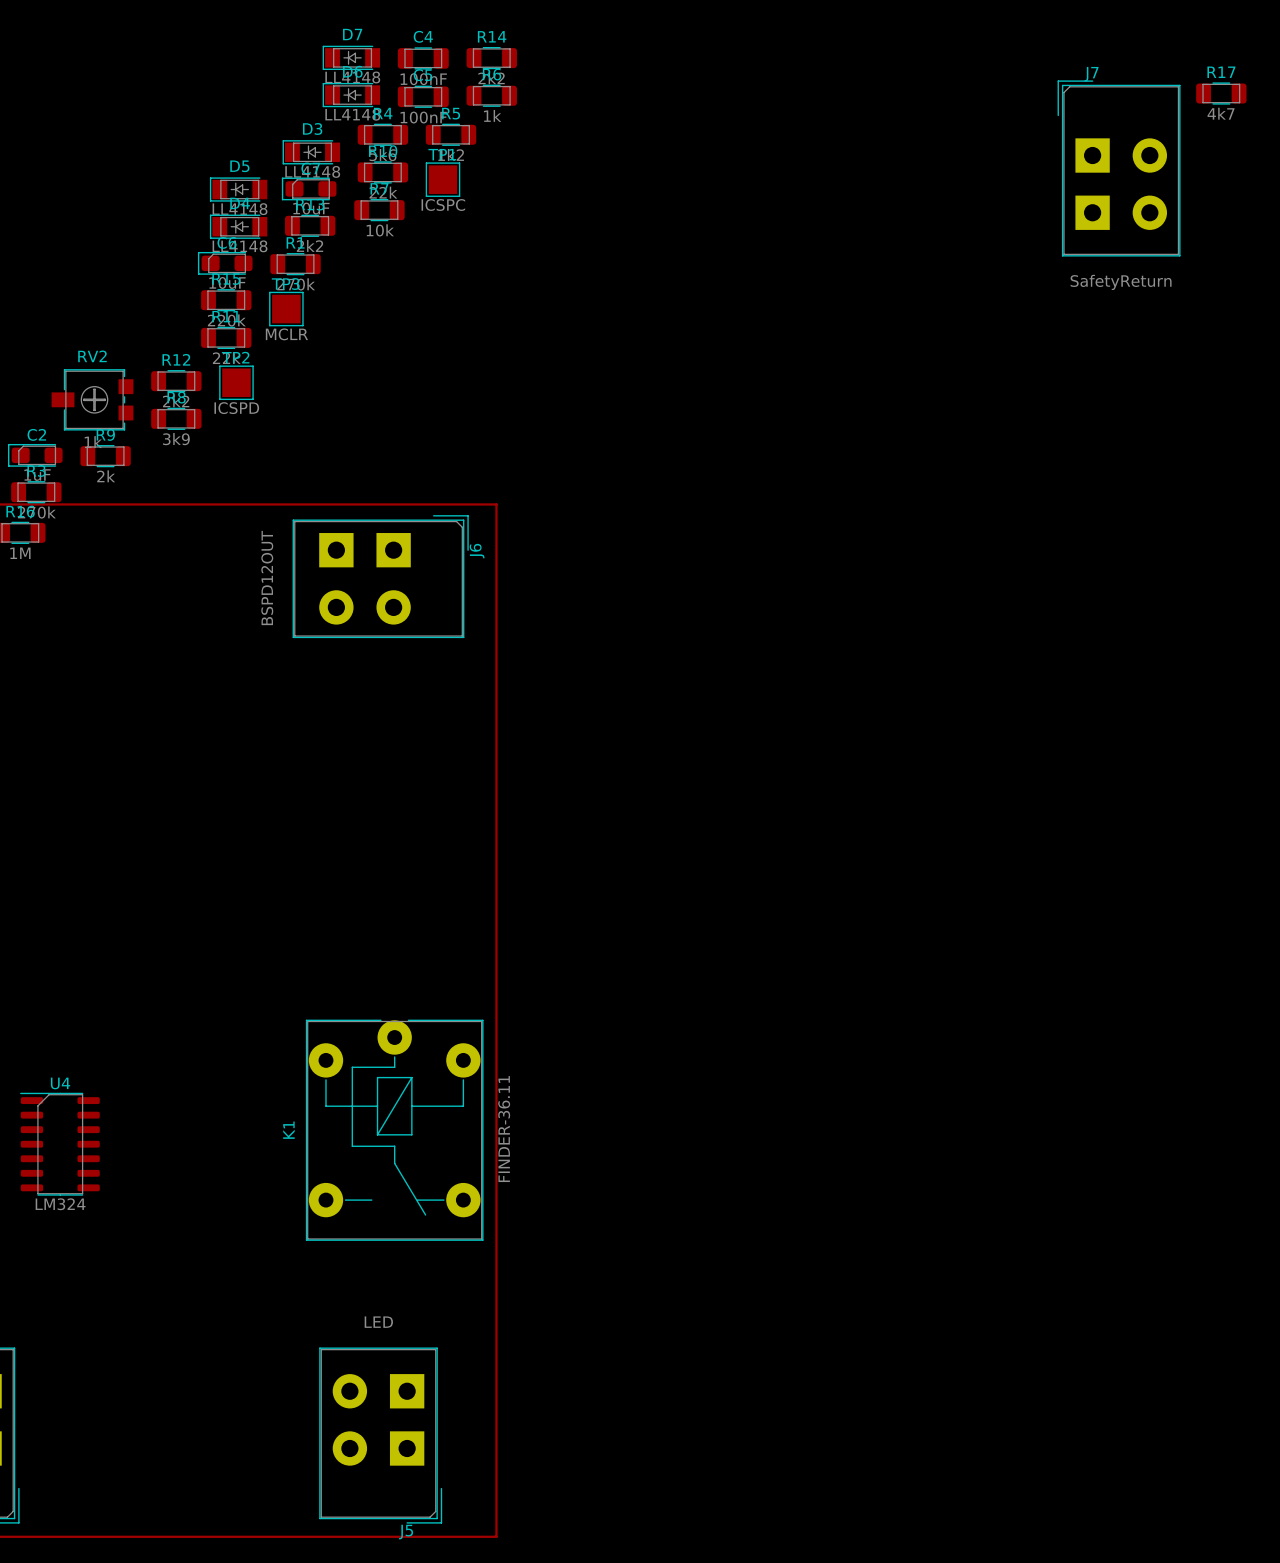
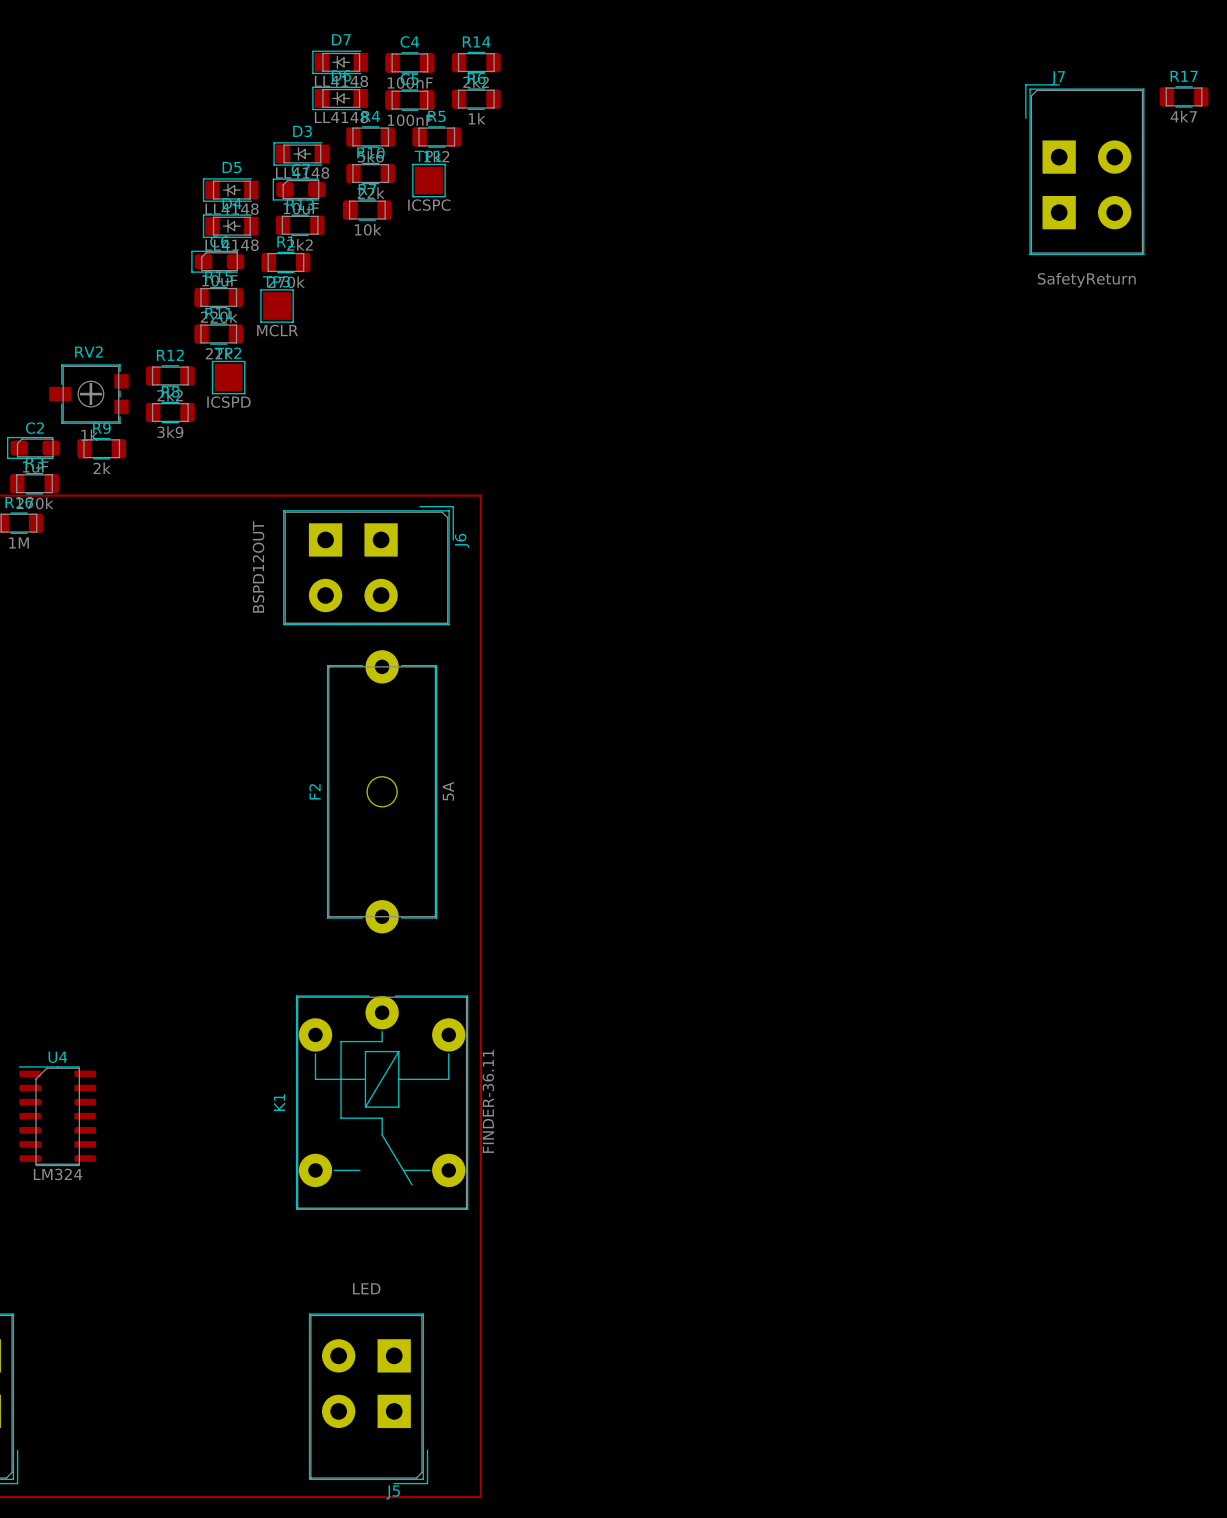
F2: none -> 5A (382, 791)

